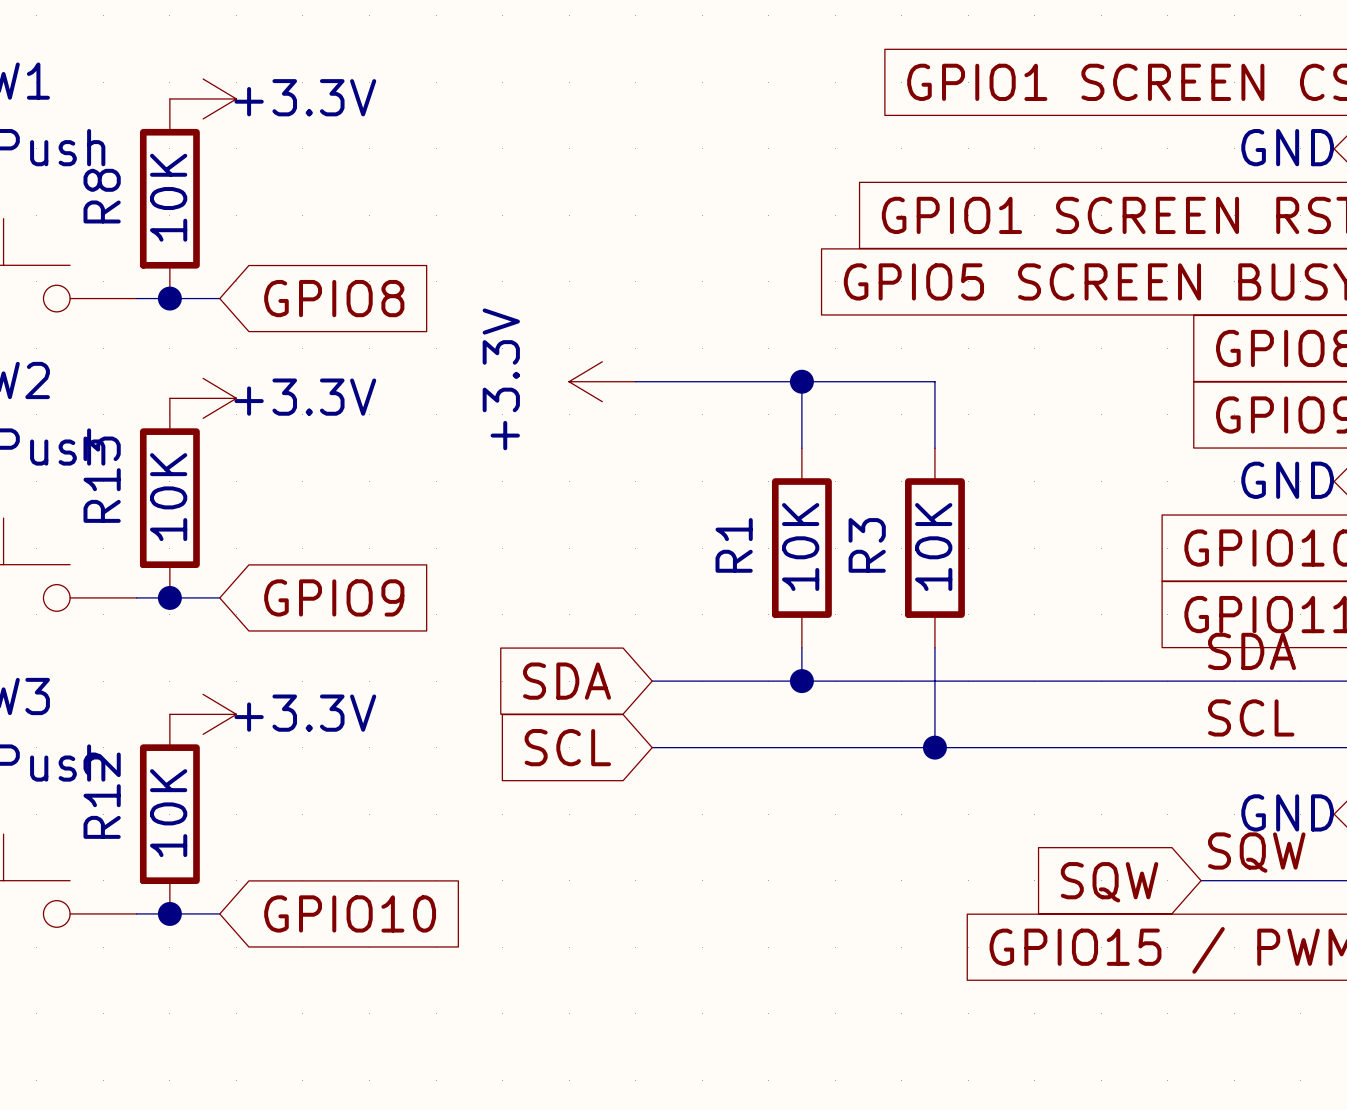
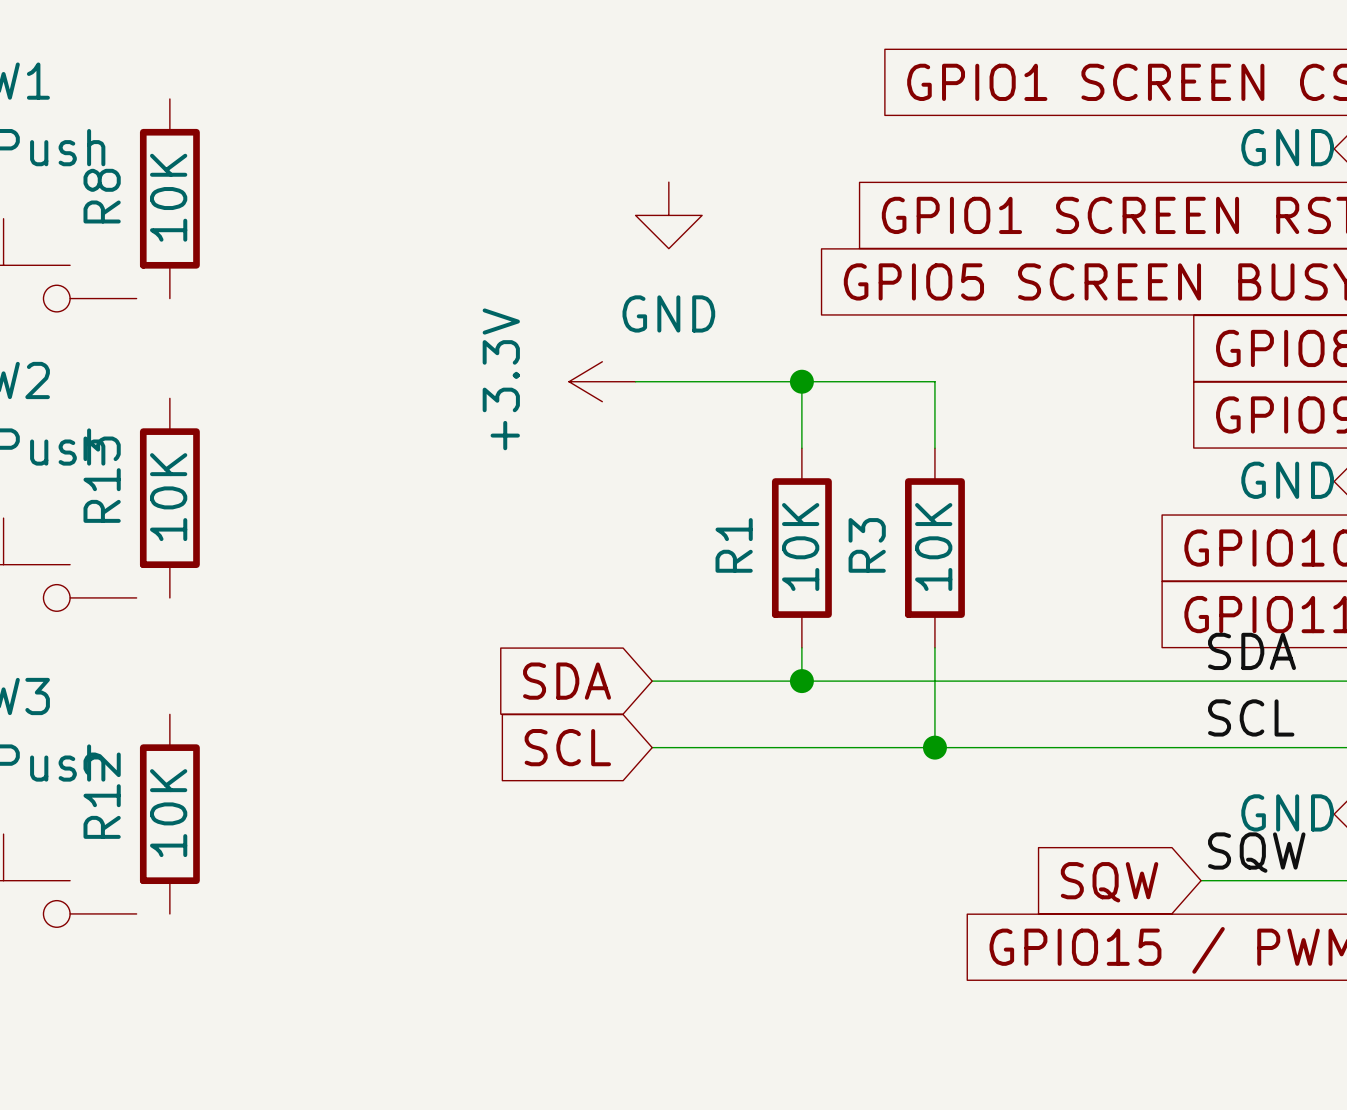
power symbol: +3.3V (203, 98) -> none
power symbol: none -> GND (668, 215)
wire: (136, 298) (219, 298) -> none
junction: (169, 298) -> none
global label: GPIO8 (334, 298) -> none
power symbol: +3.3V (203, 398) -> none
wire: (136, 597) (219, 597) -> none
junction: (169, 597) -> none
global label: GPIO9 (334, 597) -> none
power symbol: +3.3V (203, 714) -> none
wire: (136, 913) (219, 913) -> none
junction: (169, 913) -> none
global label: GPIO10 (350, 913) -> none

